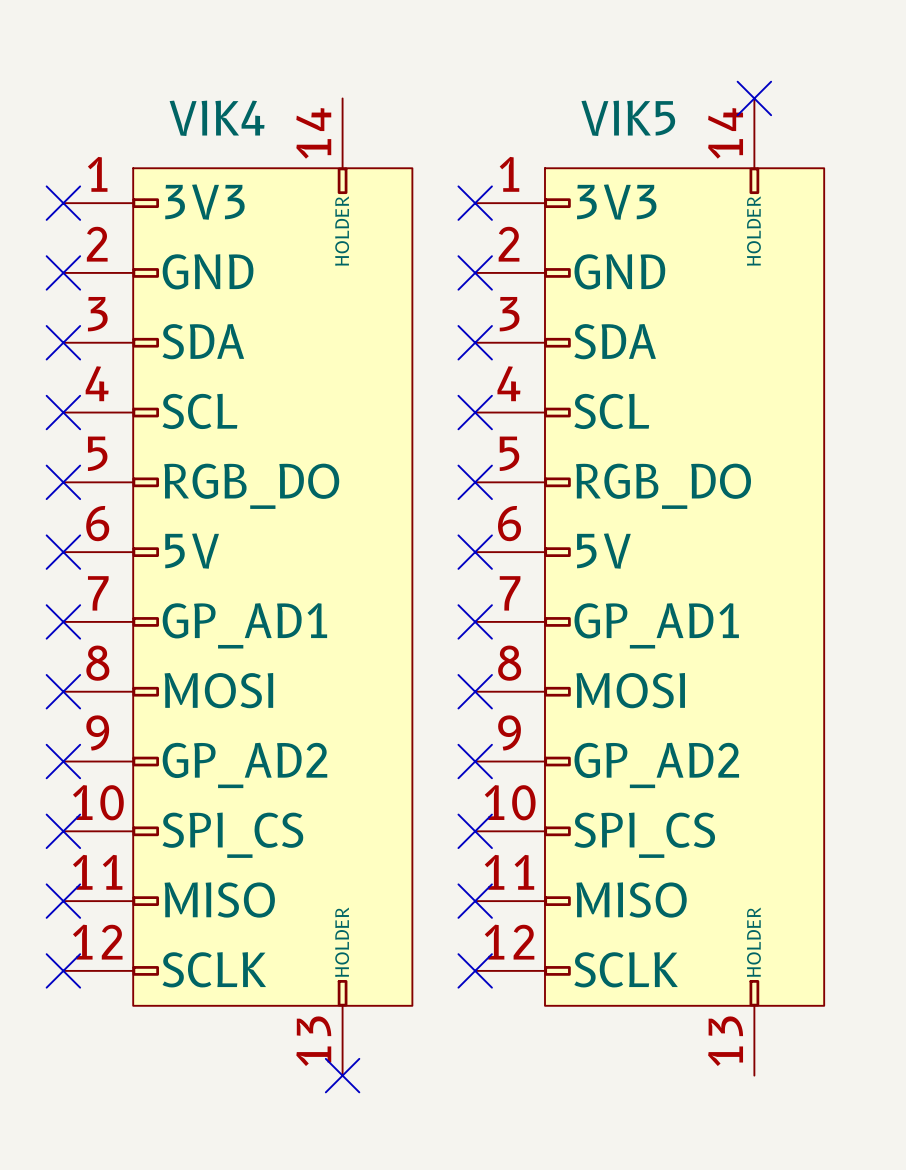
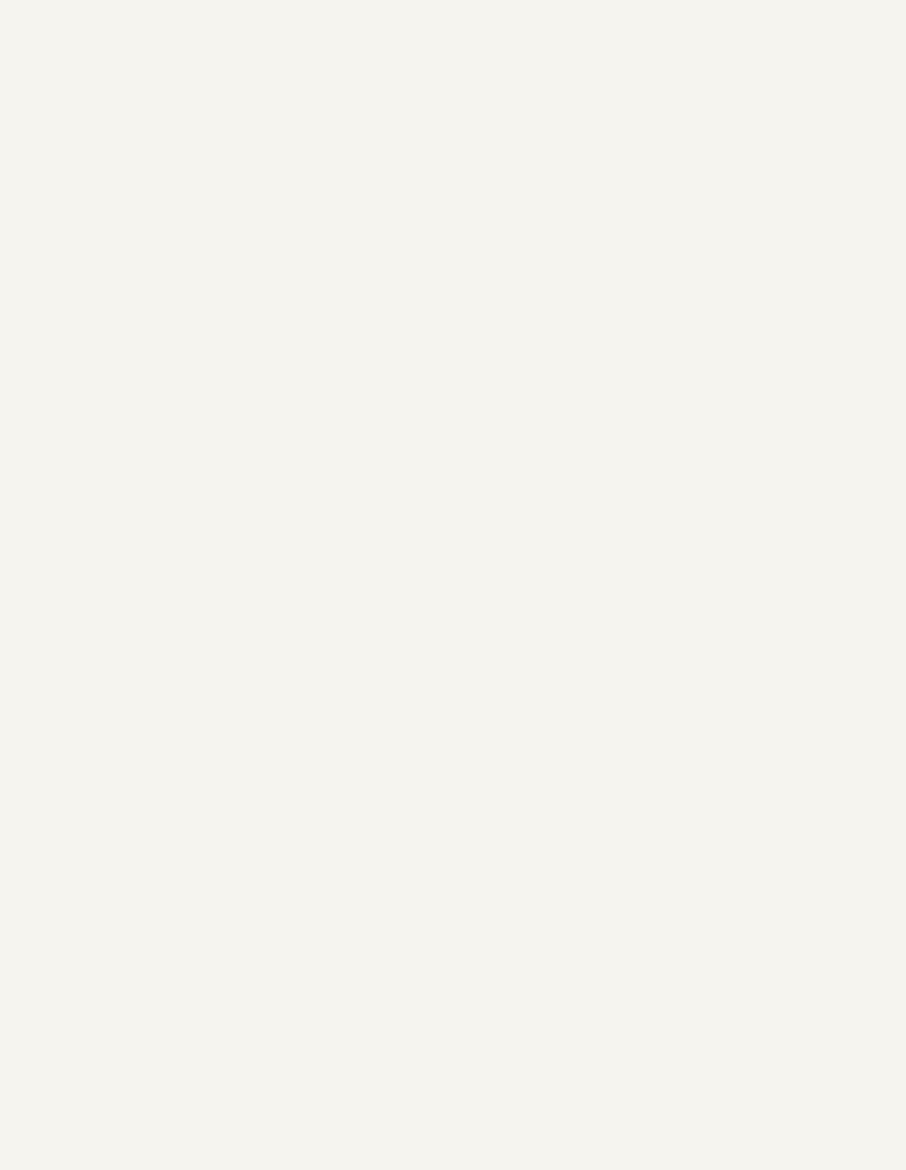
no-connect mark: (754, 98) -> none
no-connect mark: (63, 203) -> none
no-connect mark: (475, 203) -> none
no-connect mark: (63, 272) -> none
no-connect mark: (475, 272) -> none
no-connect mark: (63, 342) -> none
no-connect mark: (475, 342) -> none
no-connect mark: (63, 412) -> none
no-connect mark: (475, 412) -> none
no-connect mark: (63, 482) -> none
no-connect mark: (475, 482) -> none
no-connect mark: (63, 552) -> none
no-connect mark: (475, 552) -> none
VIK4: (237, 587) -> none
VIK5: (649, 587) -> none
no-connect mark: (63, 621) -> none
no-connect mark: (475, 621) -> none
no-connect mark: (63, 691) -> none
no-connect mark: (475, 691) -> none
no-connect mark: (63, 761) -> none
no-connect mark: (475, 761) -> none
no-connect mark: (63, 831) -> none
no-connect mark: (475, 831) -> none
no-connect mark: (63, 901) -> none
no-connect mark: (475, 901) -> none
no-connect mark: (63, 970) -> none
no-connect mark: (475, 970) -> none
no-connect mark: (342, 1075) -> none

